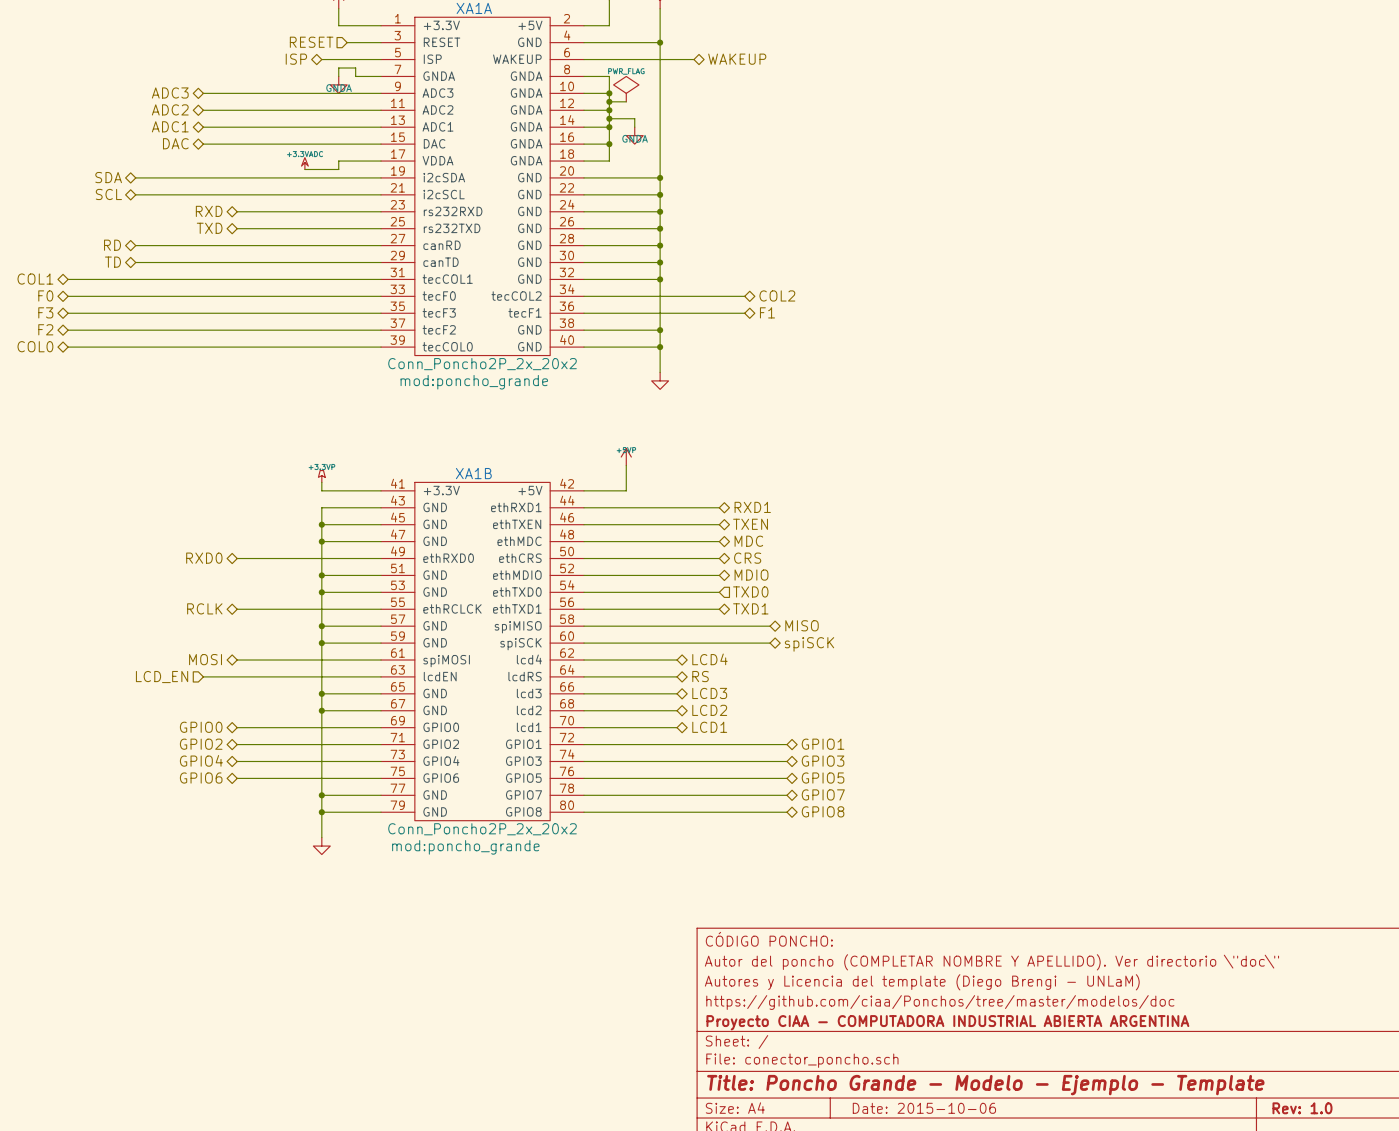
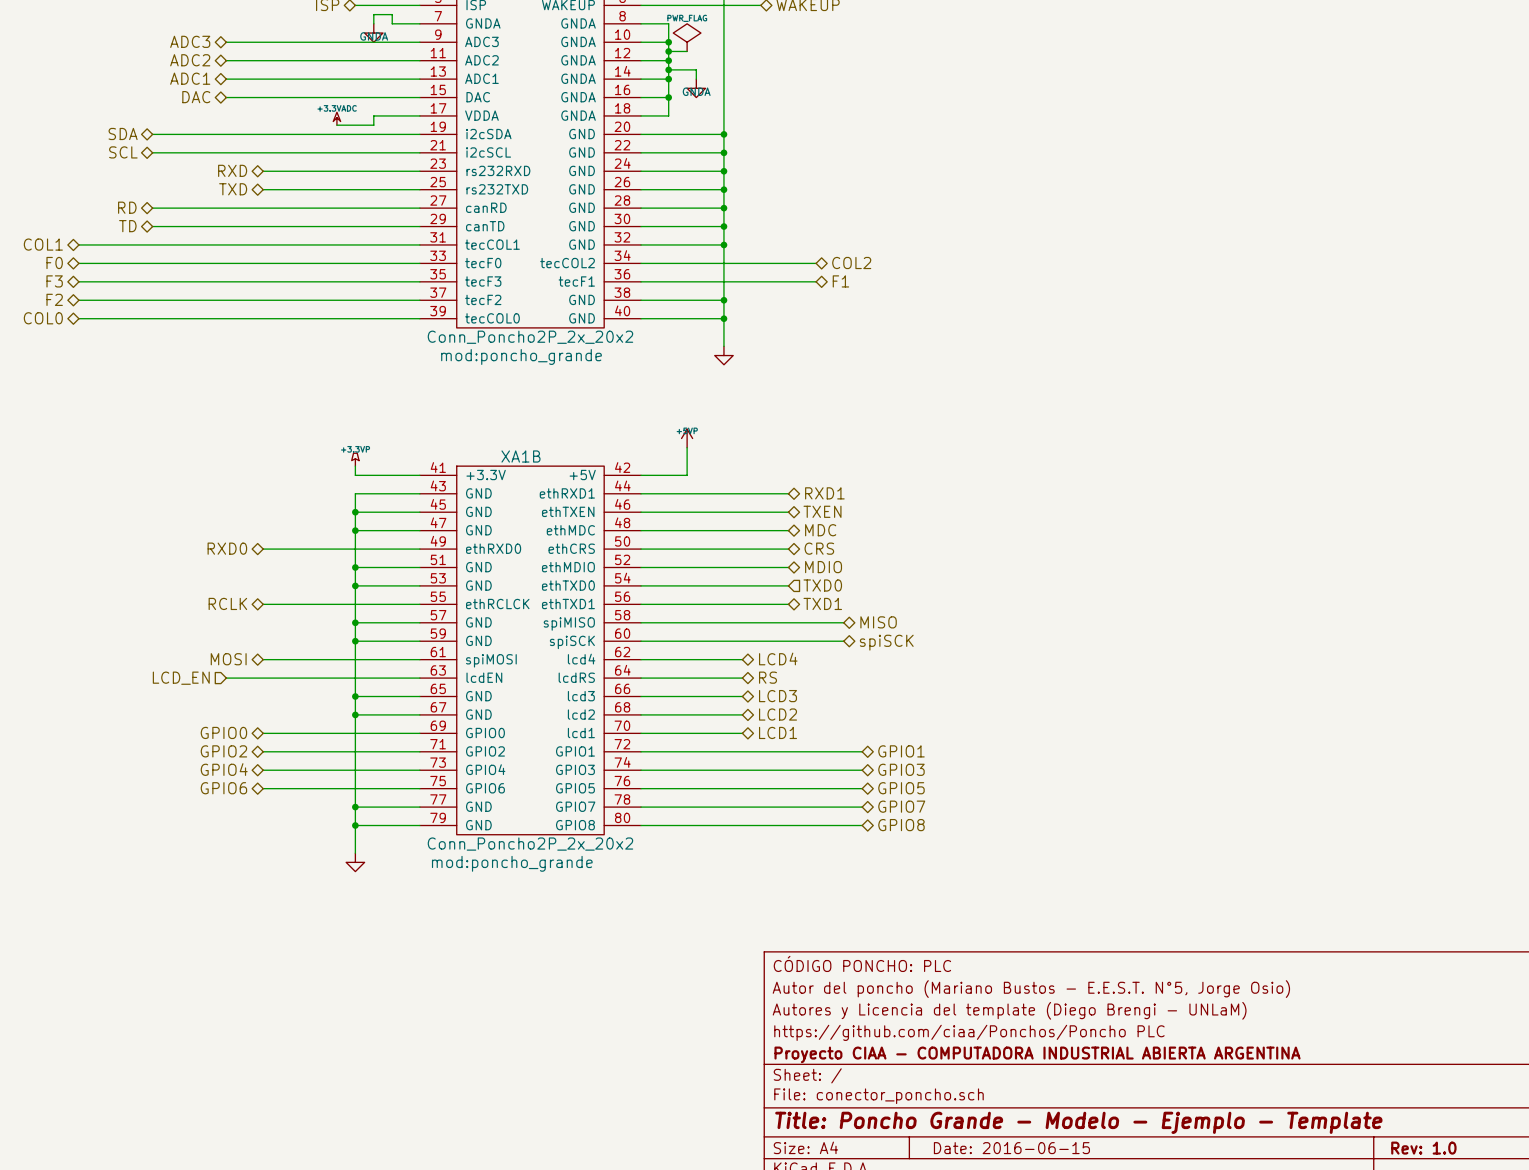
title block: CÓDIGO PONCHO: (769, 939) -> CÓDIGO PONCHO: PLC (862, 963)
title block: Autor del poncho (COMPLETAR NOMBRE Y APELLIDO). Ver directorio \"doc\" (991, 962) -> Autor del poncho (Mariano Bustos - E.E.S.T. N°5, Jorge Osio) (1031, 989)
title block: https://github.com/ciaa/Ponchos/tree/master/modelos/doc (940, 1002) -> https://github.com/ciaa/Ponchos/Poncho PLC (969, 1032)
title block: Date: 2015-10-06 (924, 1108) -> Date: 2016-06-15 (1011, 1148)

